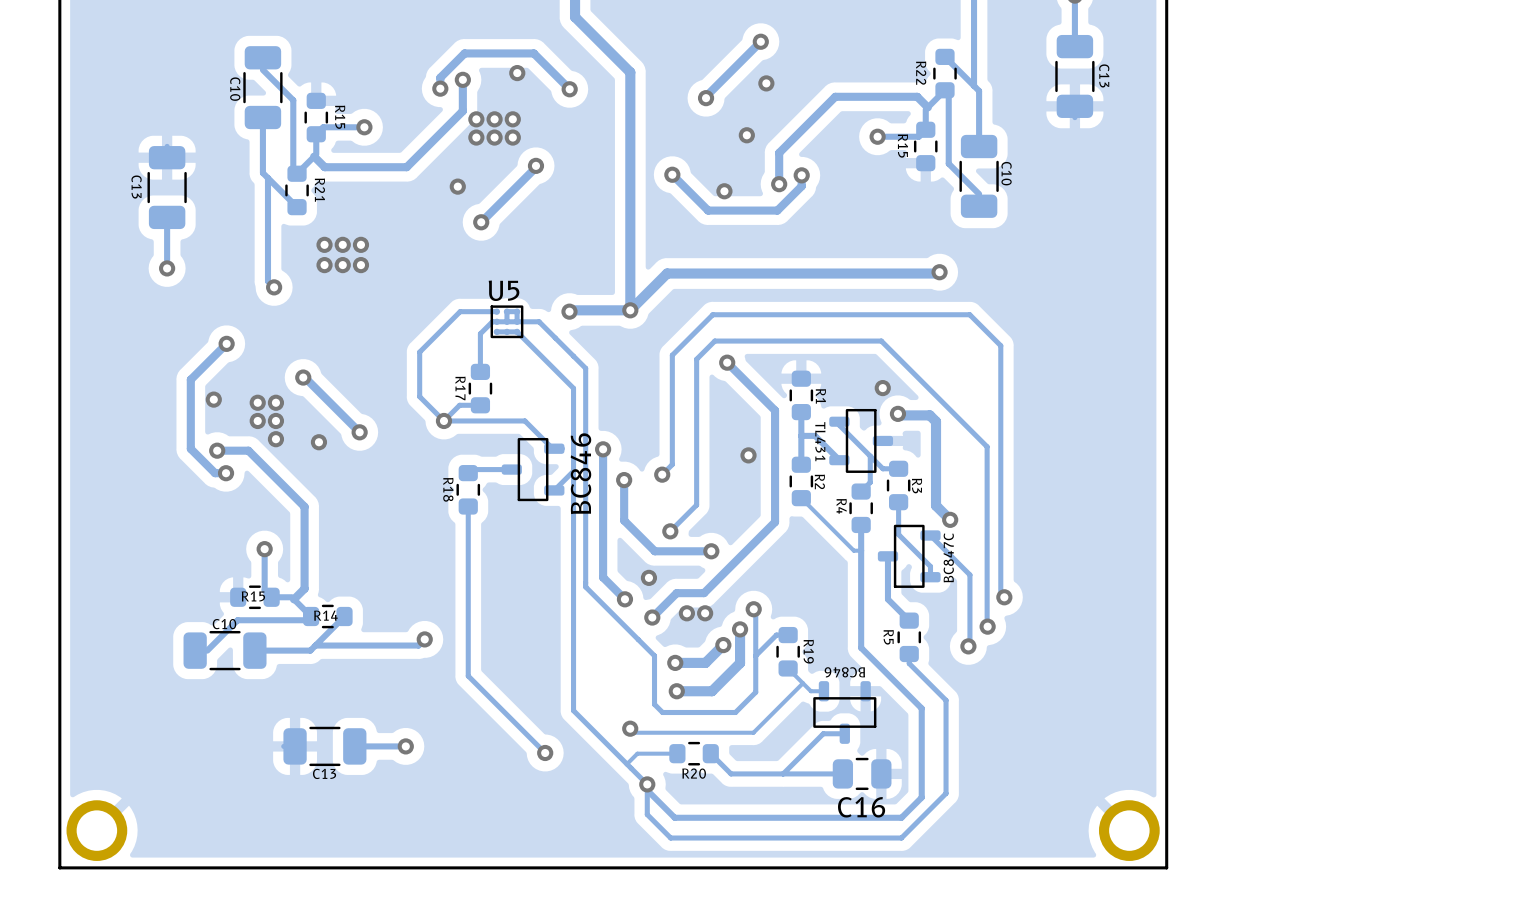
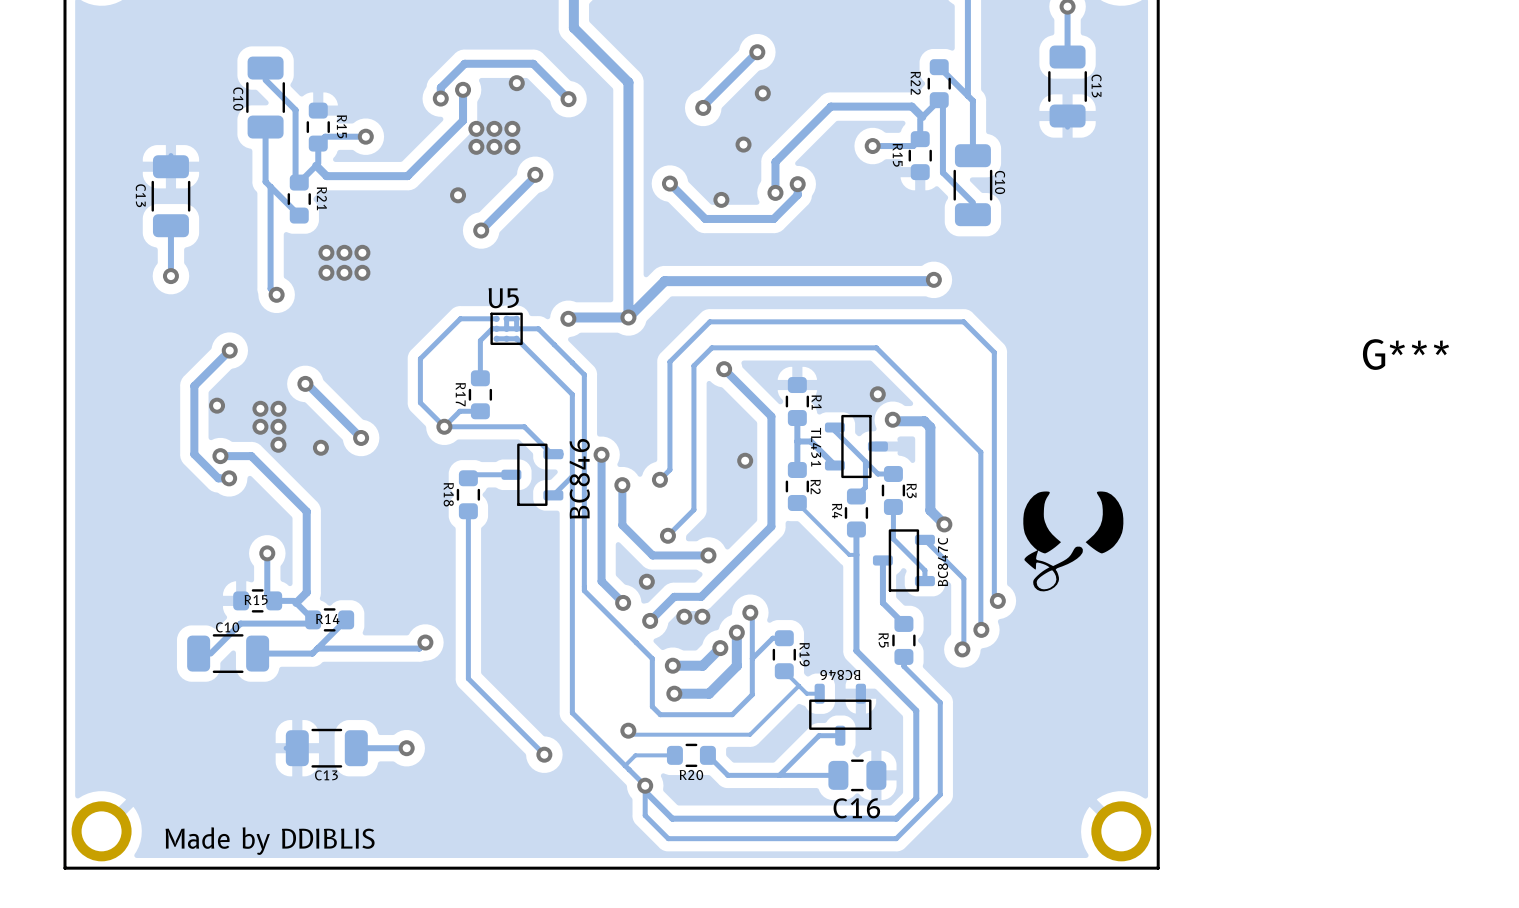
G***: none -> (1073, 541)
text: none -> Made by DDIBLIS (270, 841)

